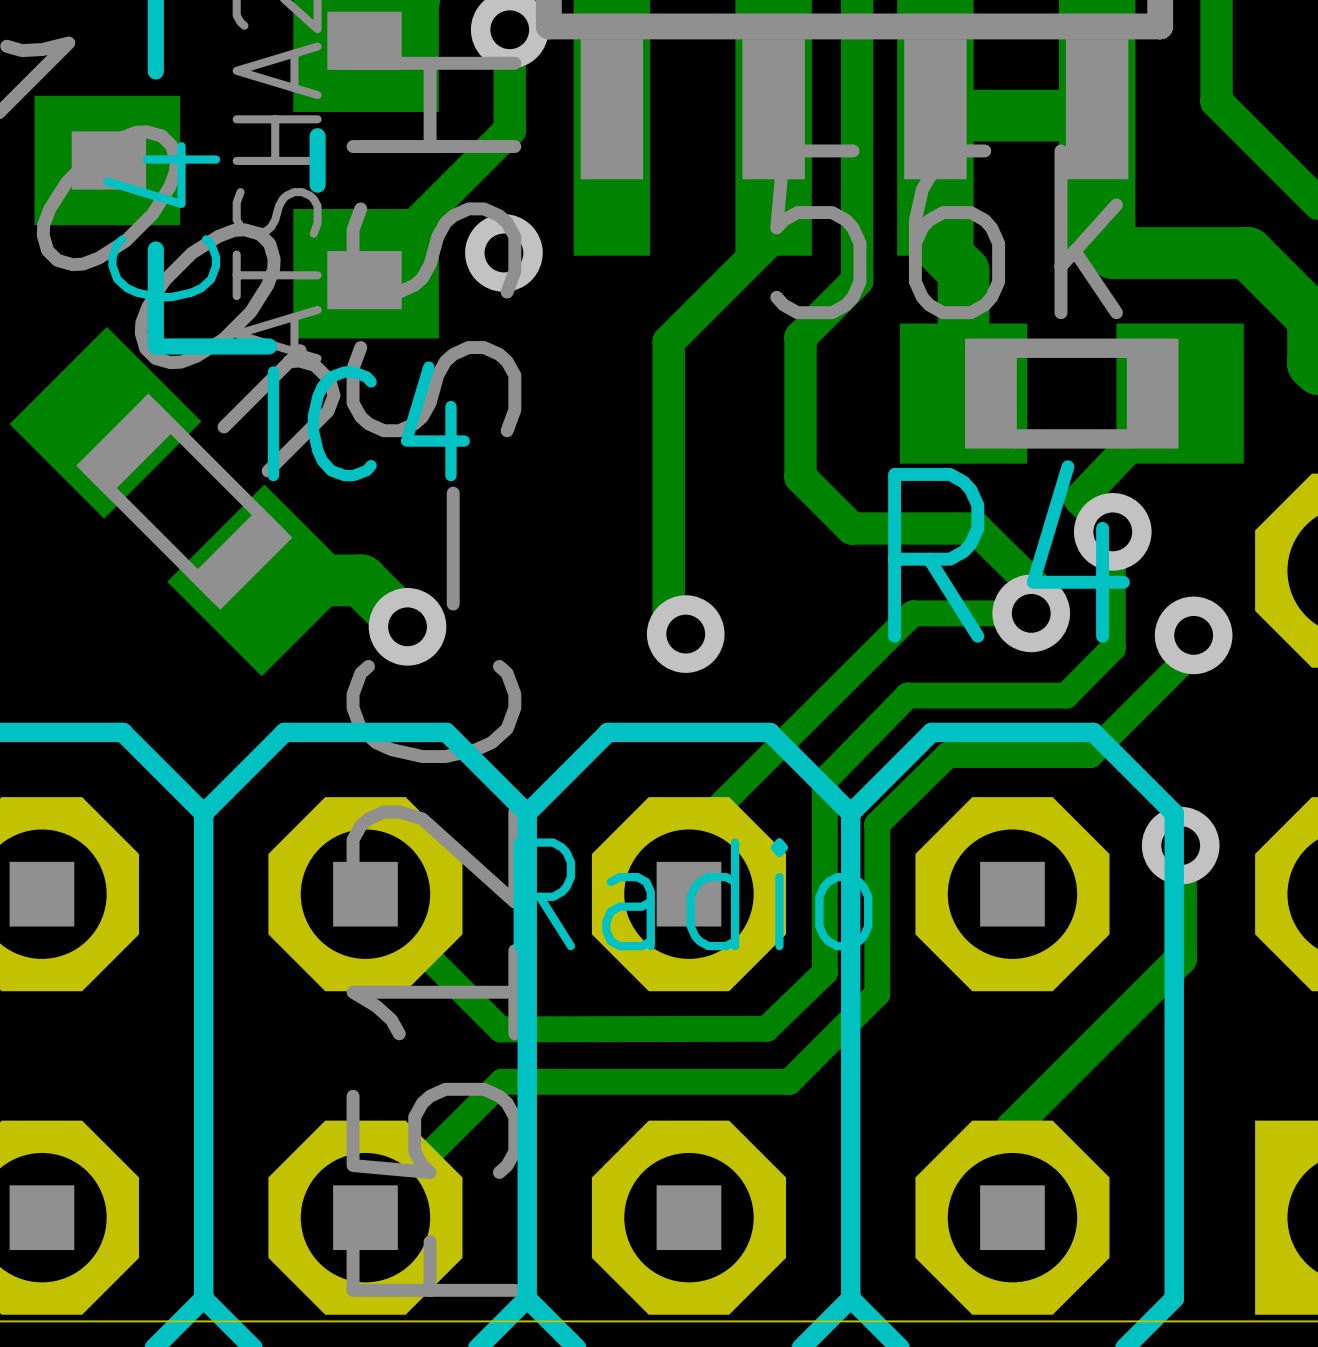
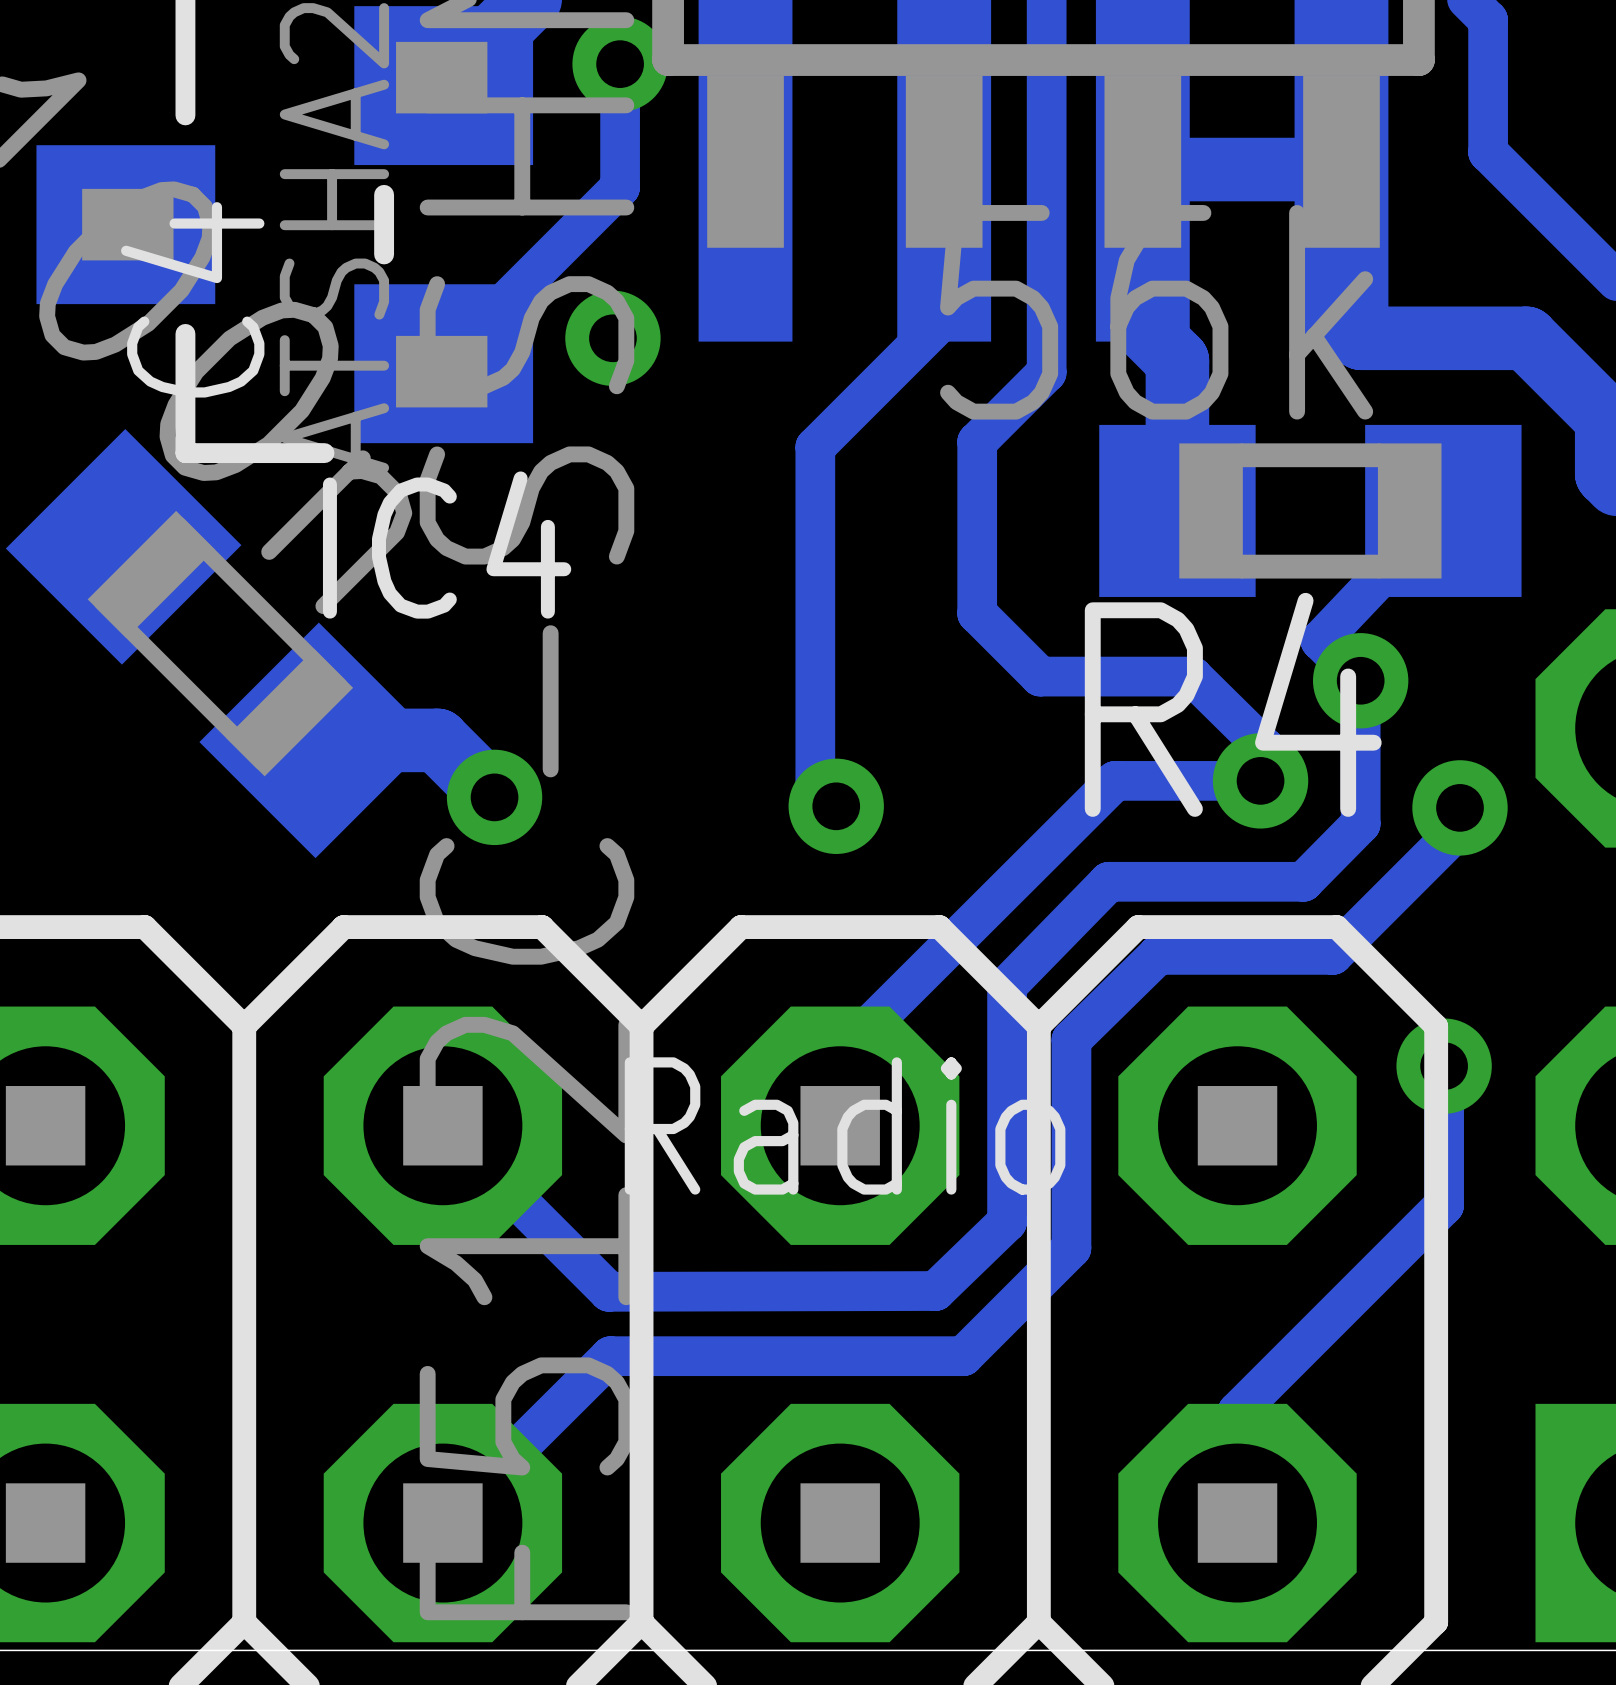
track width: thin (1112, 531) (1112, 648) (1066, 695) (907, 695) (824, 780) (824, 972) (766, 1028) (500, 1029) (365, 894) -> thick (1360, 680) (1360, 823) (1303, 881) (1108, 881) (1007, 985) (1007, 1221) (935, 1291) (608, 1291) (442, 1125)
track width: thin (1031, 613) (912, 613) (688, 836) (688, 894) -> thick (1260, 780) (1115, 780) (840, 1055) (840, 1125)
track width: thin (1187, 658) (1090, 755) (947, 755) (877, 824) (877, 993) (789, 1081) (501, 1081) (365, 1217) -> thick (1452, 835) (1332, 954) (1158, 954) (1071, 1039) (1071, 1248) (963, 1356) (610, 1356) (442, 1523)

